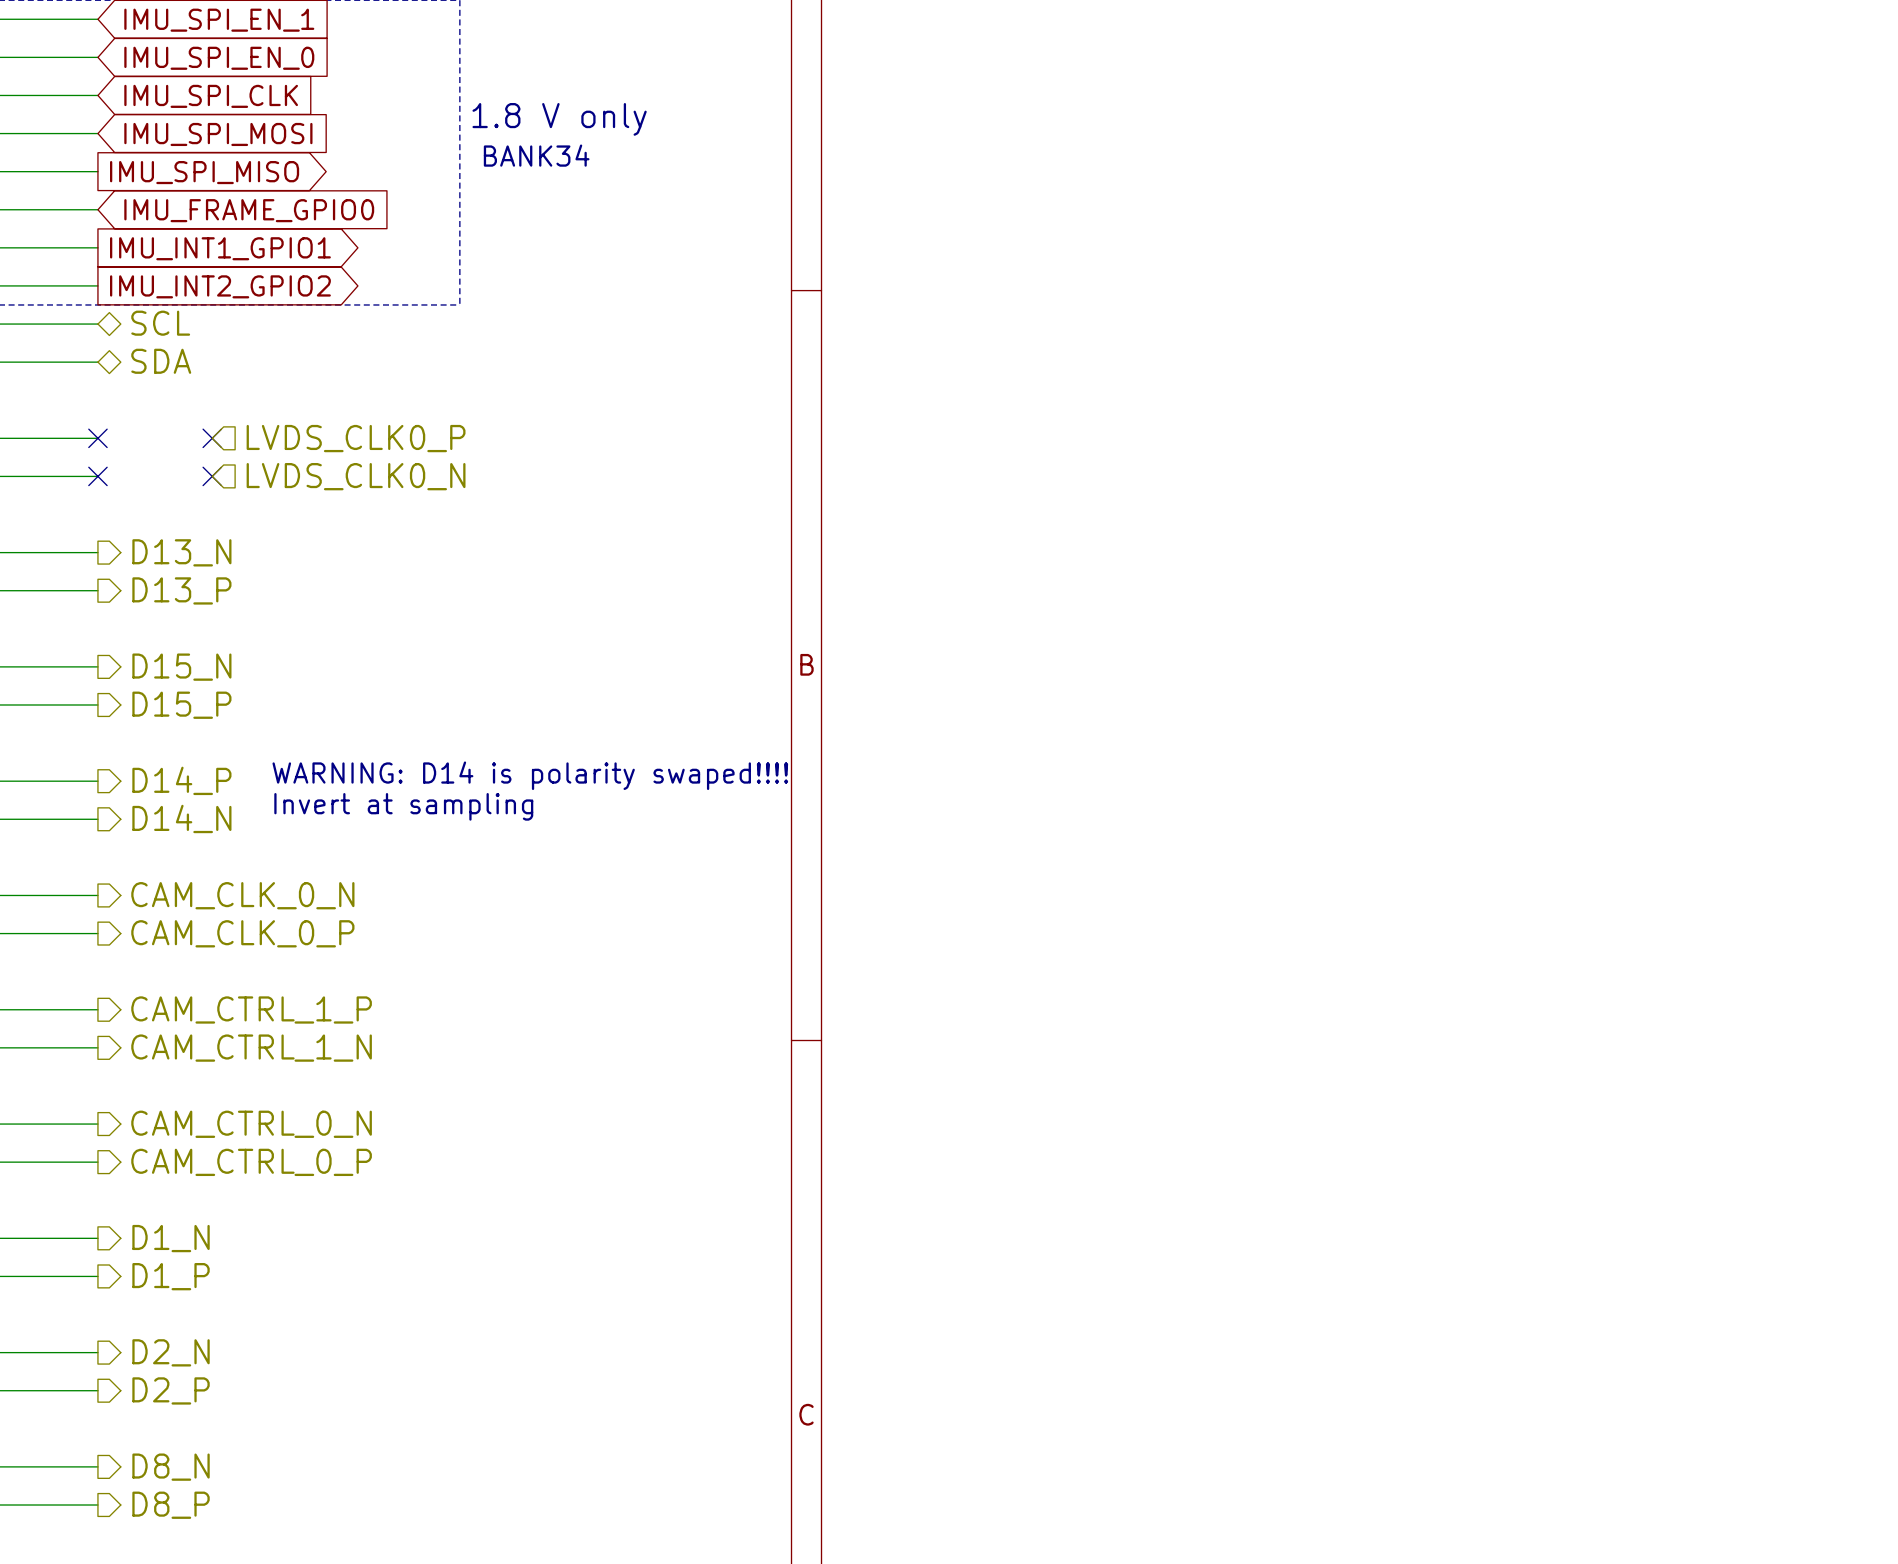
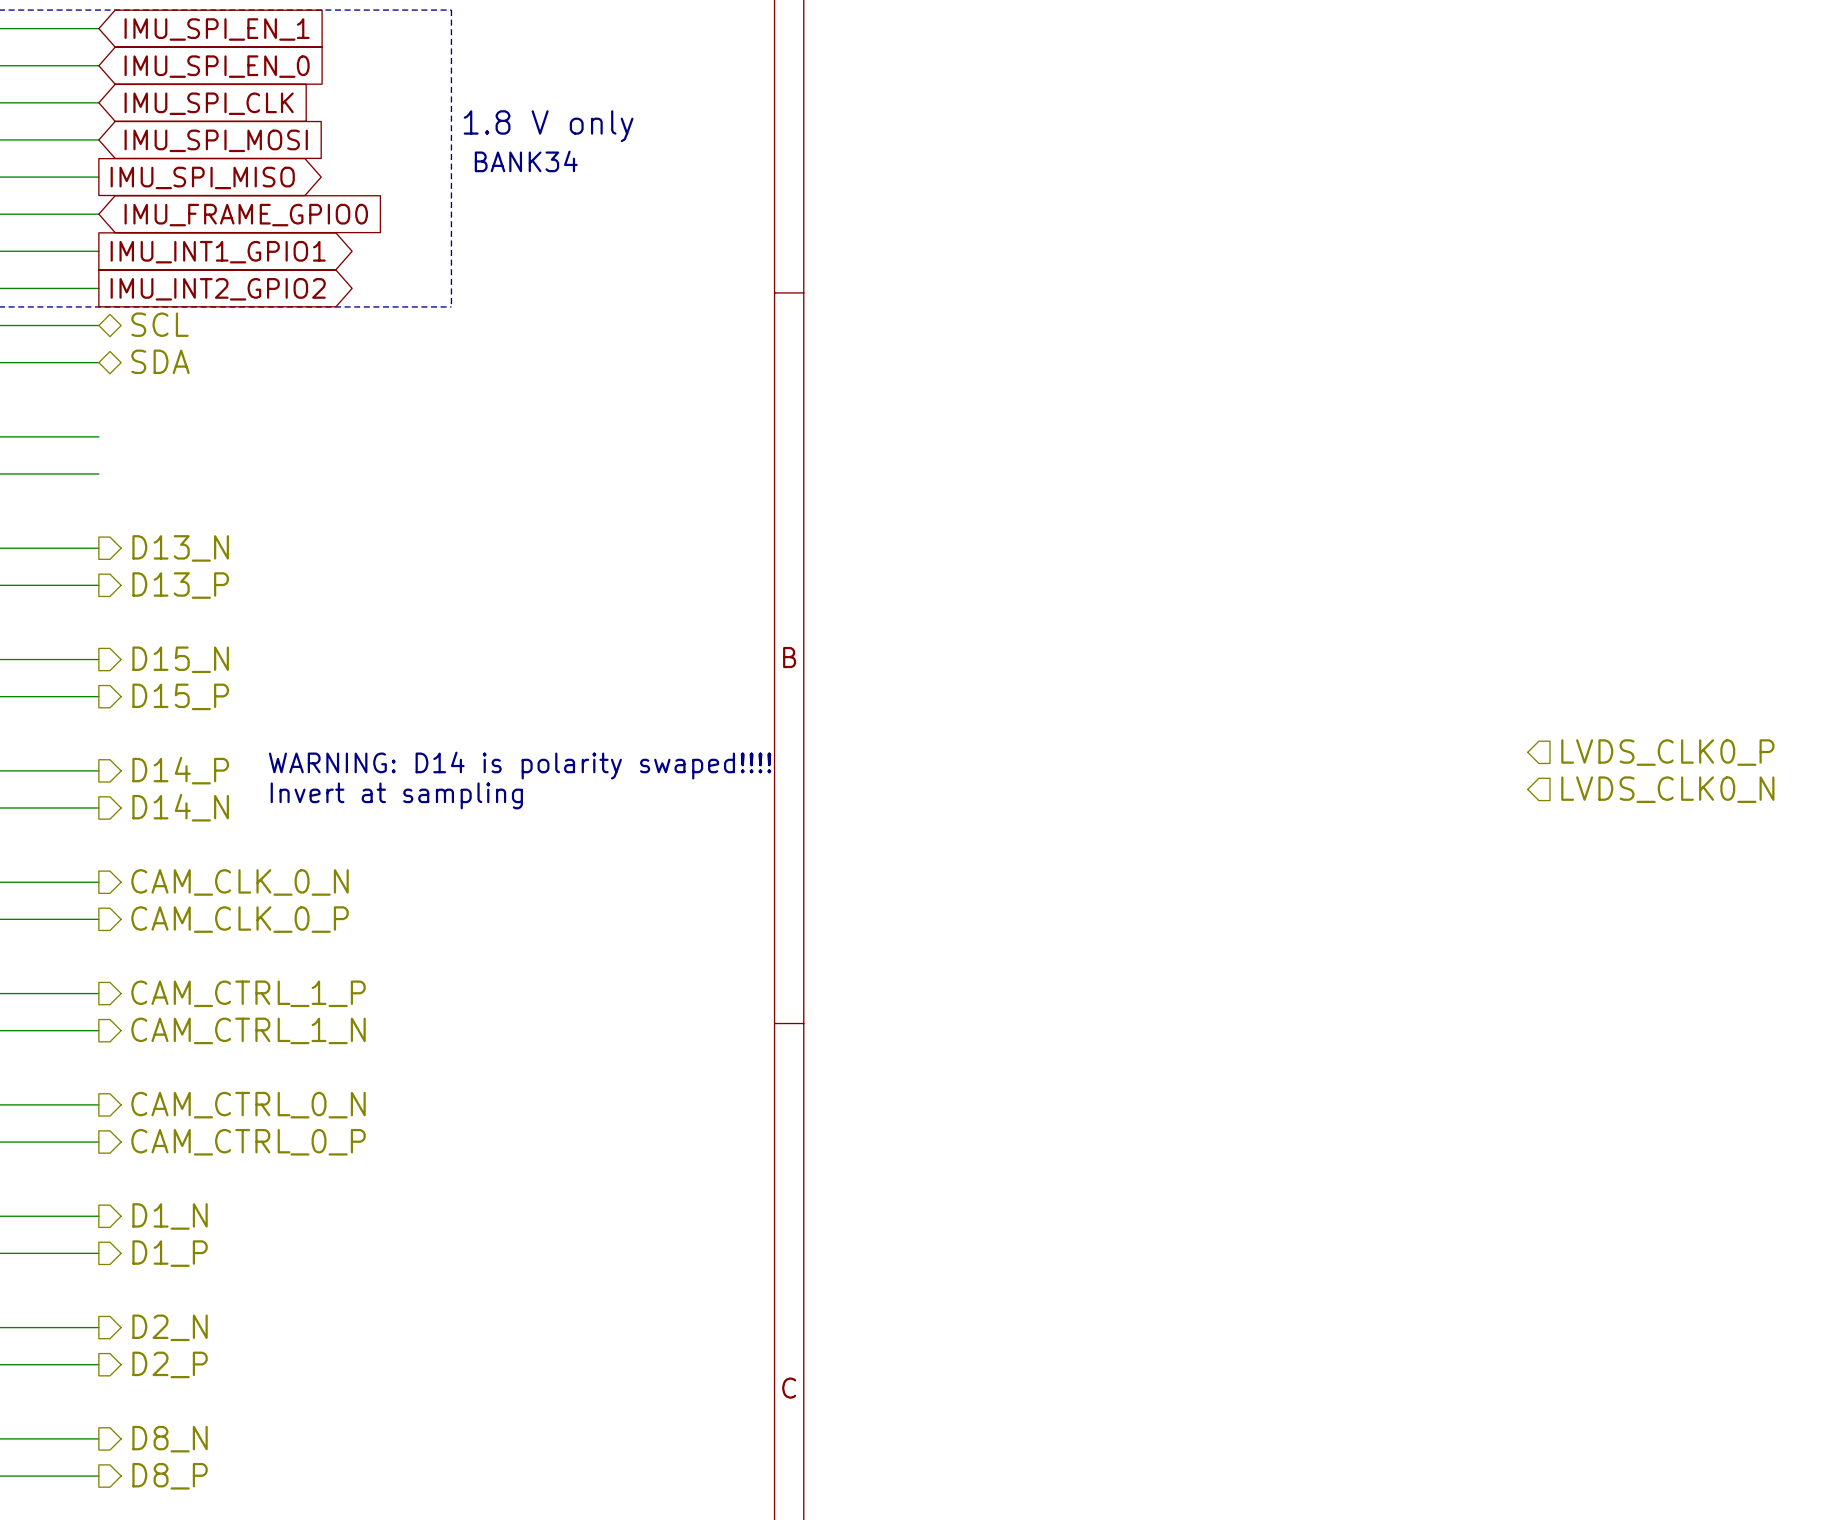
no-connect mark: (97, 438) -> none
no-connect mark: (212, 438) -> none
hierarchical label: LVDS_CLK0_P (356, 438) -> none
no-connect mark: (97, 476) -> none
no-connect mark: (212, 476) -> none
hierarchical label: LVDS_CLK0_N (356, 476) -> none
hierarchical label: none -> LVDS_CLK0_P (1667, 752)
hierarchical label: none -> LVDS_CLK0_N (1667, 789)

